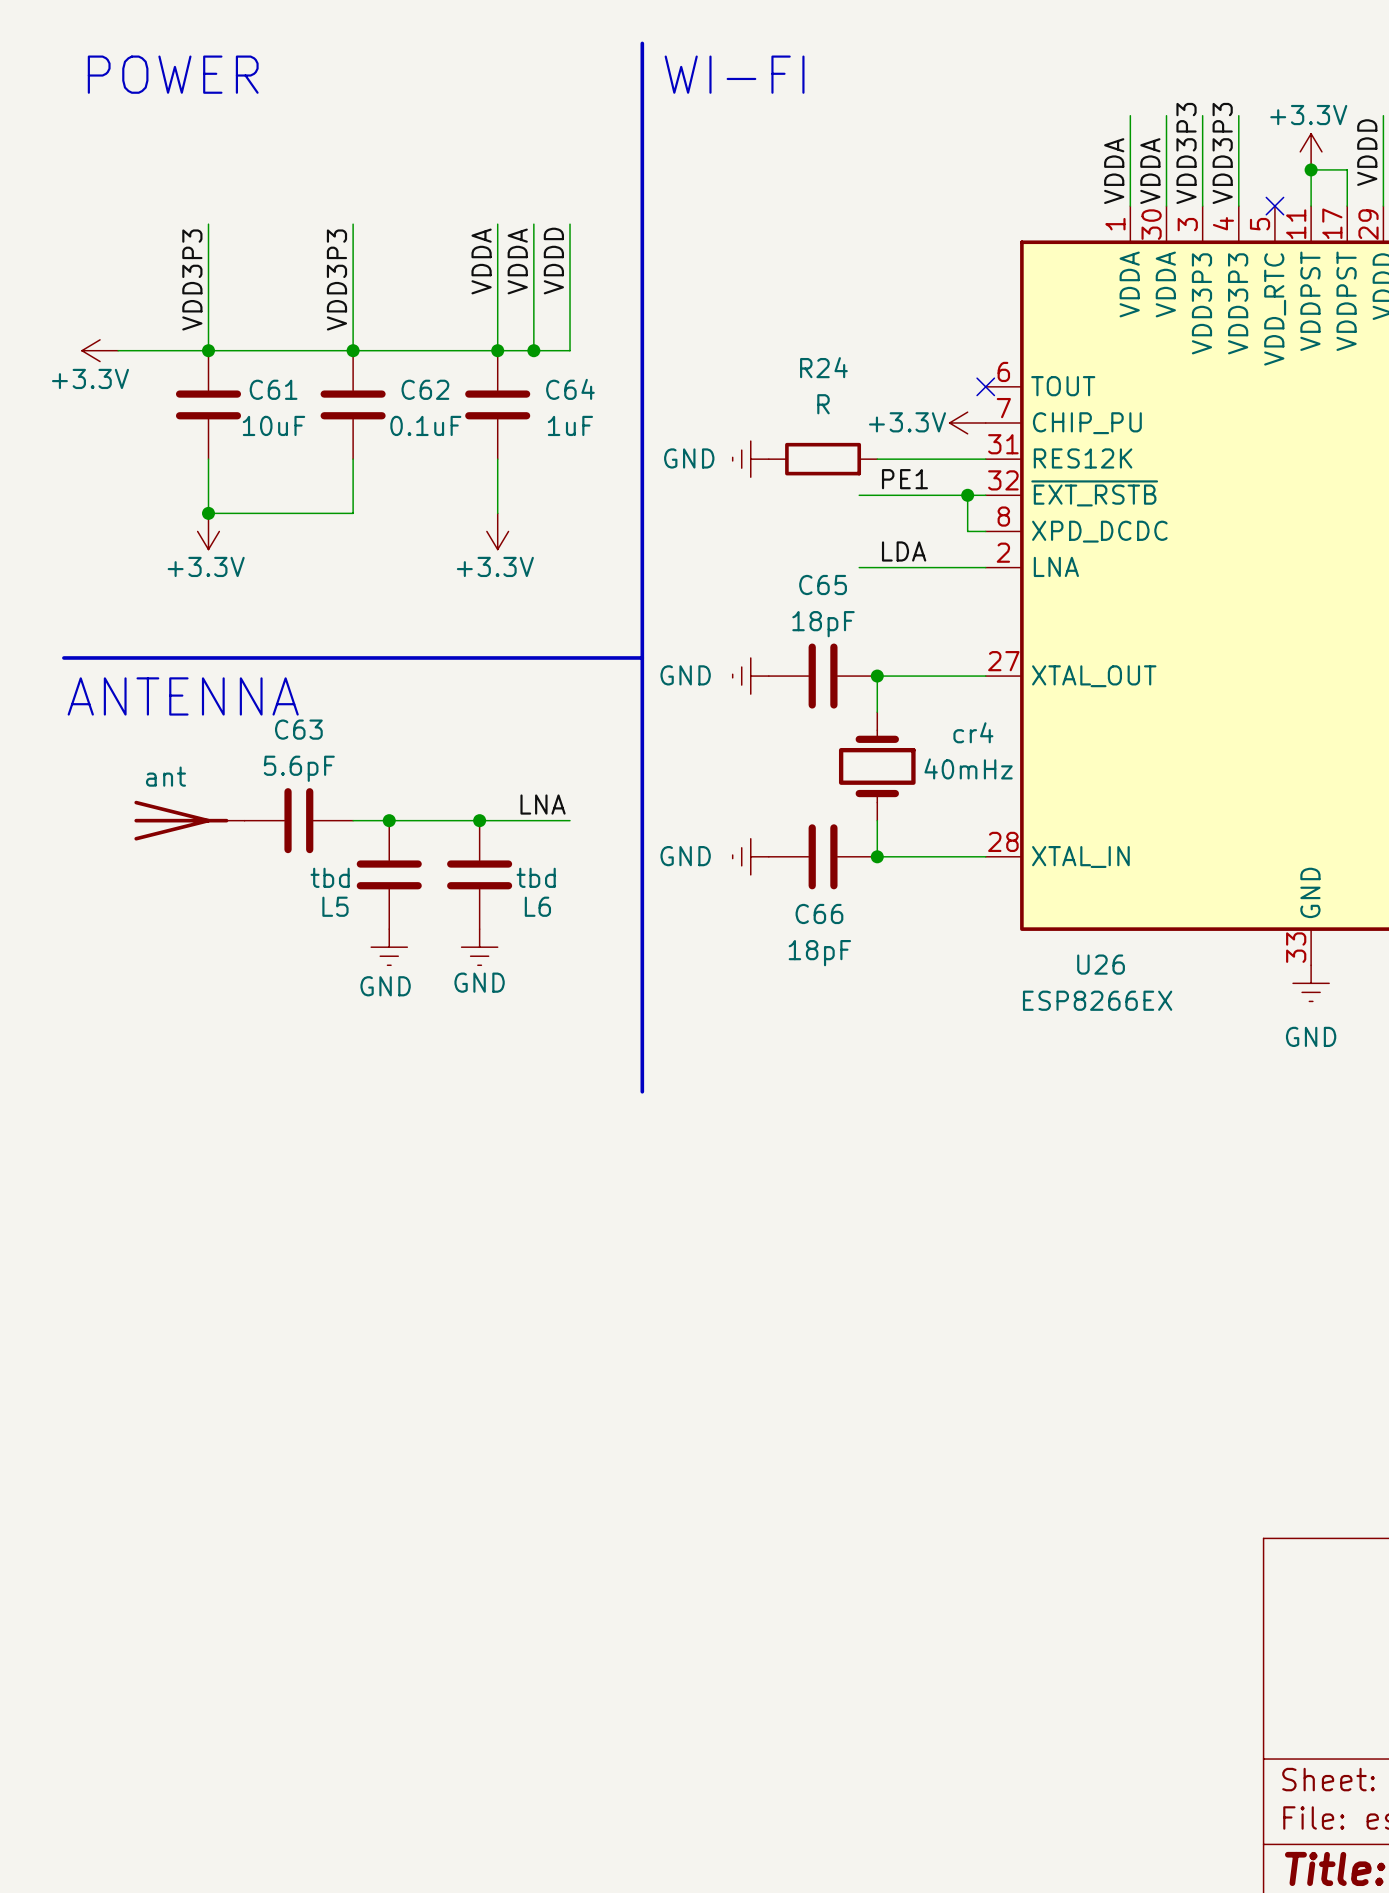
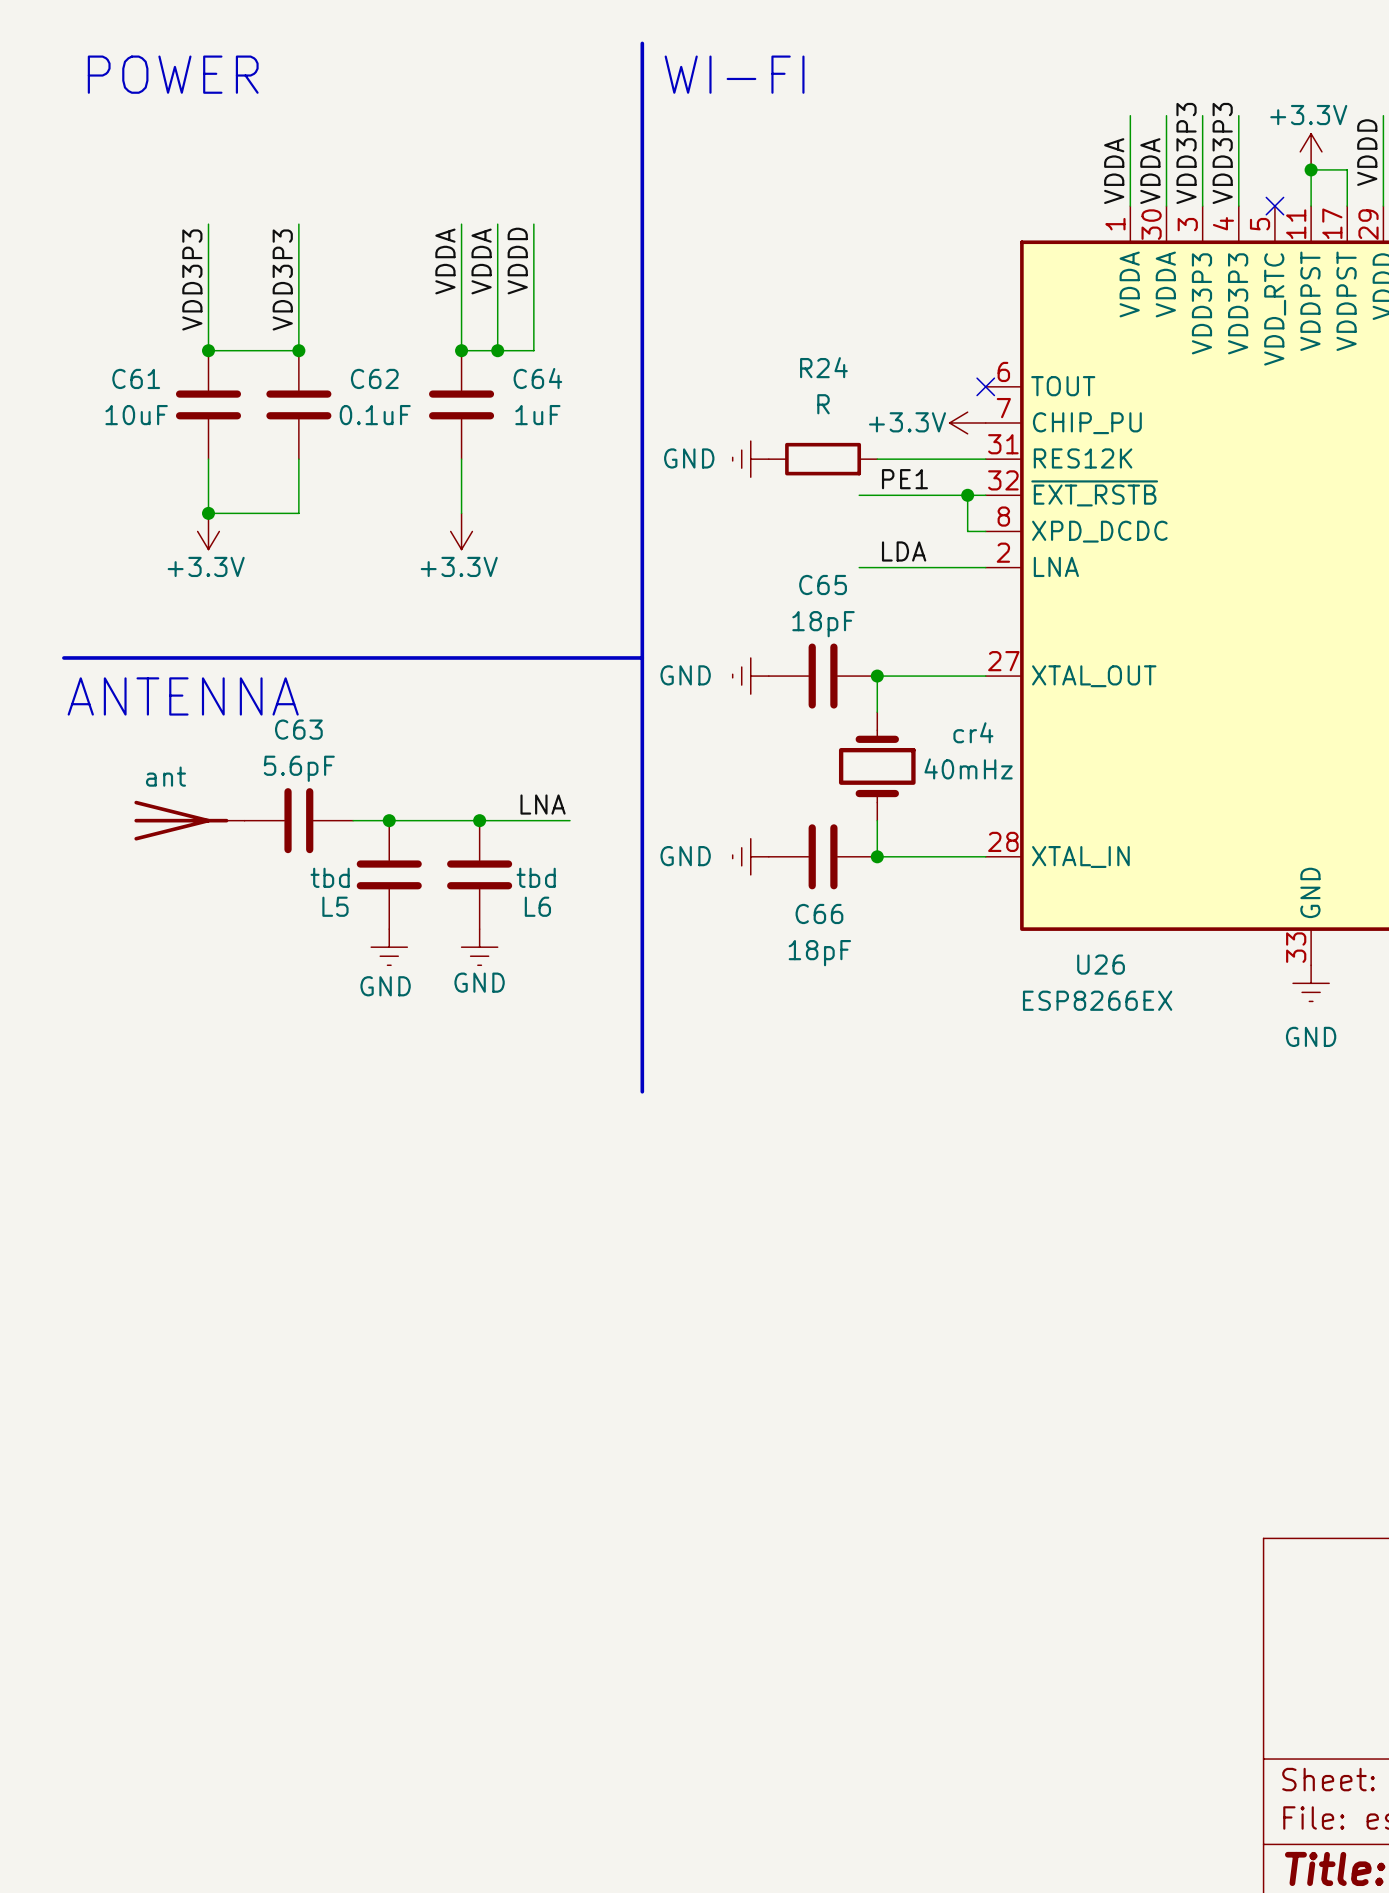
wire: (353, 224) (353, 350) -> (461, 224) (461, 350)
wire: (570, 224) (570, 350) (533, 350) -> none
label: none -> VDDA (445, 261)
label: VDDA (517, 261) -> VDDD (517, 261)
label: VDDD (553, 261) -> none
label position: VDD3P3 (336, 279) -> VDD3P3 (282, 279)
power symbol: +3.3V (100, 350) -> none
wire: (118, 350) (208, 350) -> none
wire: (298, 350) (461, 350) -> (298, 350) (298, 224)
junction: none -> (298, 350)
junction: (353, 350) -> none
junction: none -> (461, 350)
junction: (533, 350) -> none
C61 name position: C61 (273, 389) -> C61 (136, 378)
C62 name position: C62 (425, 389) -> C62 (374, 378)
C64 name position: C64 (570, 389) -> C64 (537, 378)
C62 position: (353, 404) -> (298, 404)
C64 position: (497, 404) -> (461, 404)
C61 value position: 10uF (274, 425) -> 10uF (136, 415)
C62 value position: 0.1uF (425, 425) -> 0.1uF (375, 415)
C64 value position: 1uF (570, 425) -> 1uF (537, 415)
wire: (353, 459) (353, 513) (298, 513) -> (298, 459) (298, 513)
wire: (497, 459) (497, 513) -> (461, 459) (461, 513)
power symbol position: +3.3V (497, 531) -> +3.3V (461, 531)

